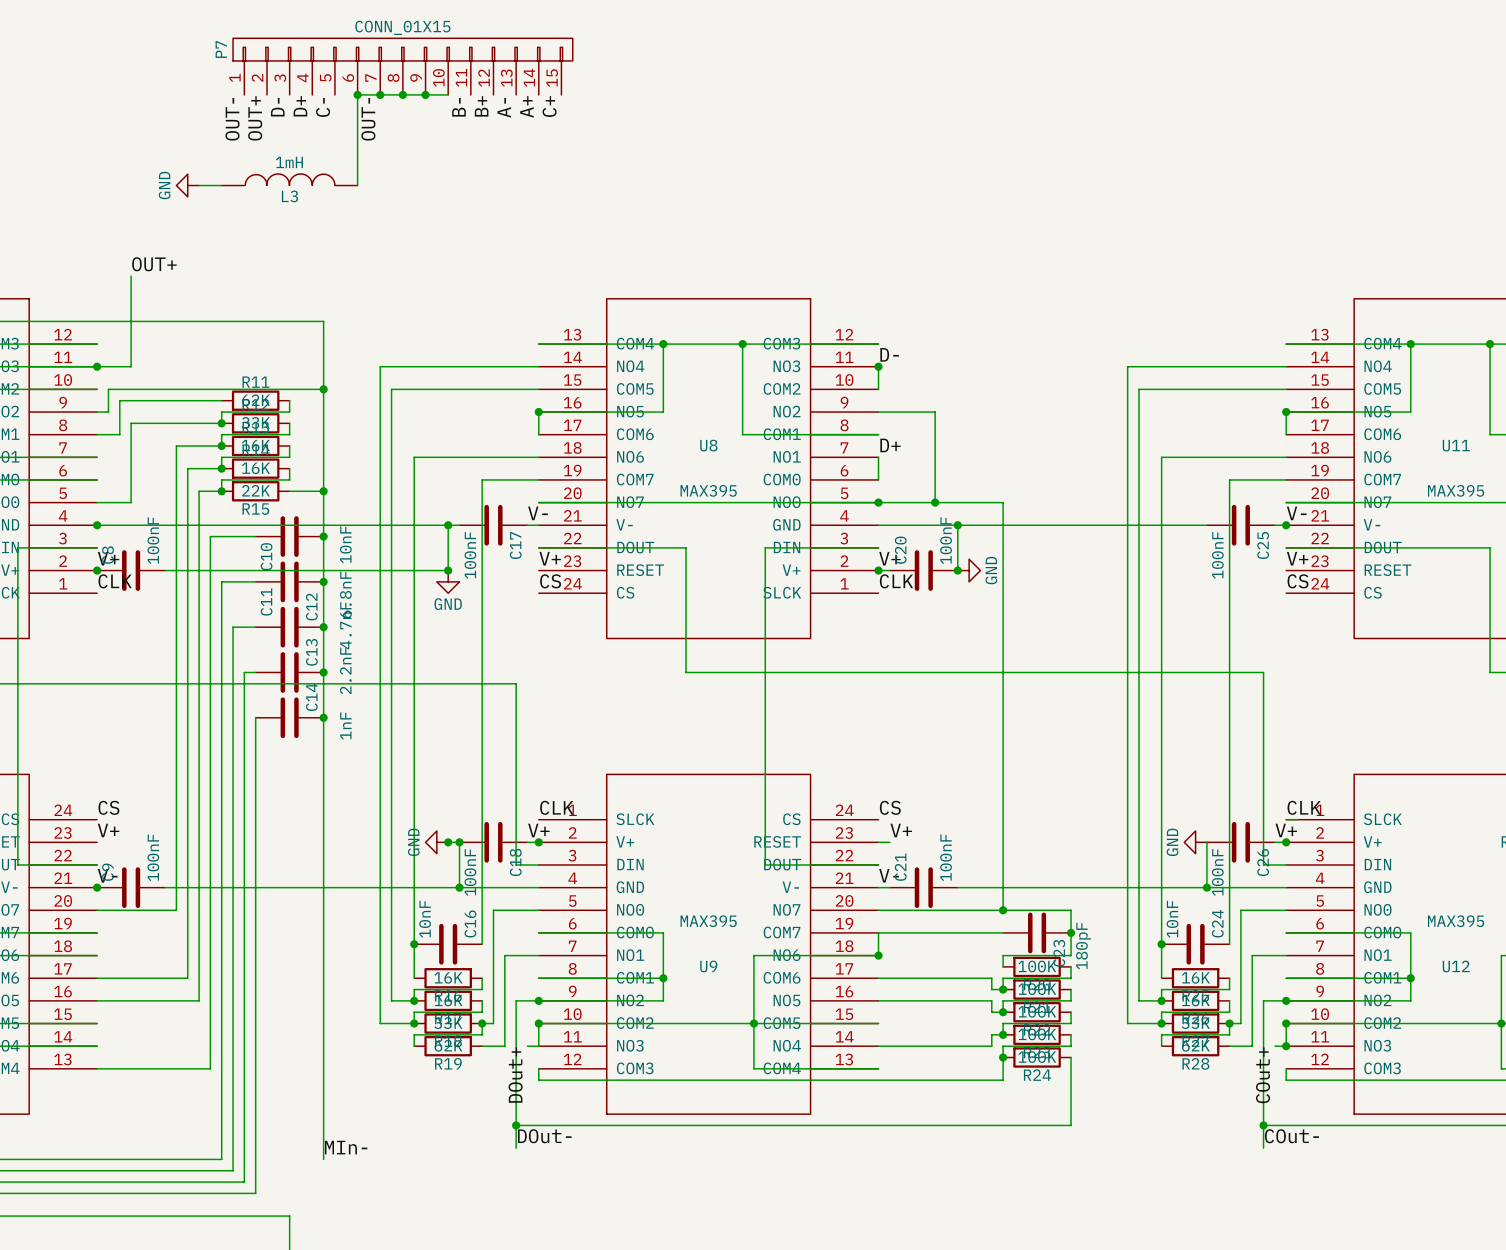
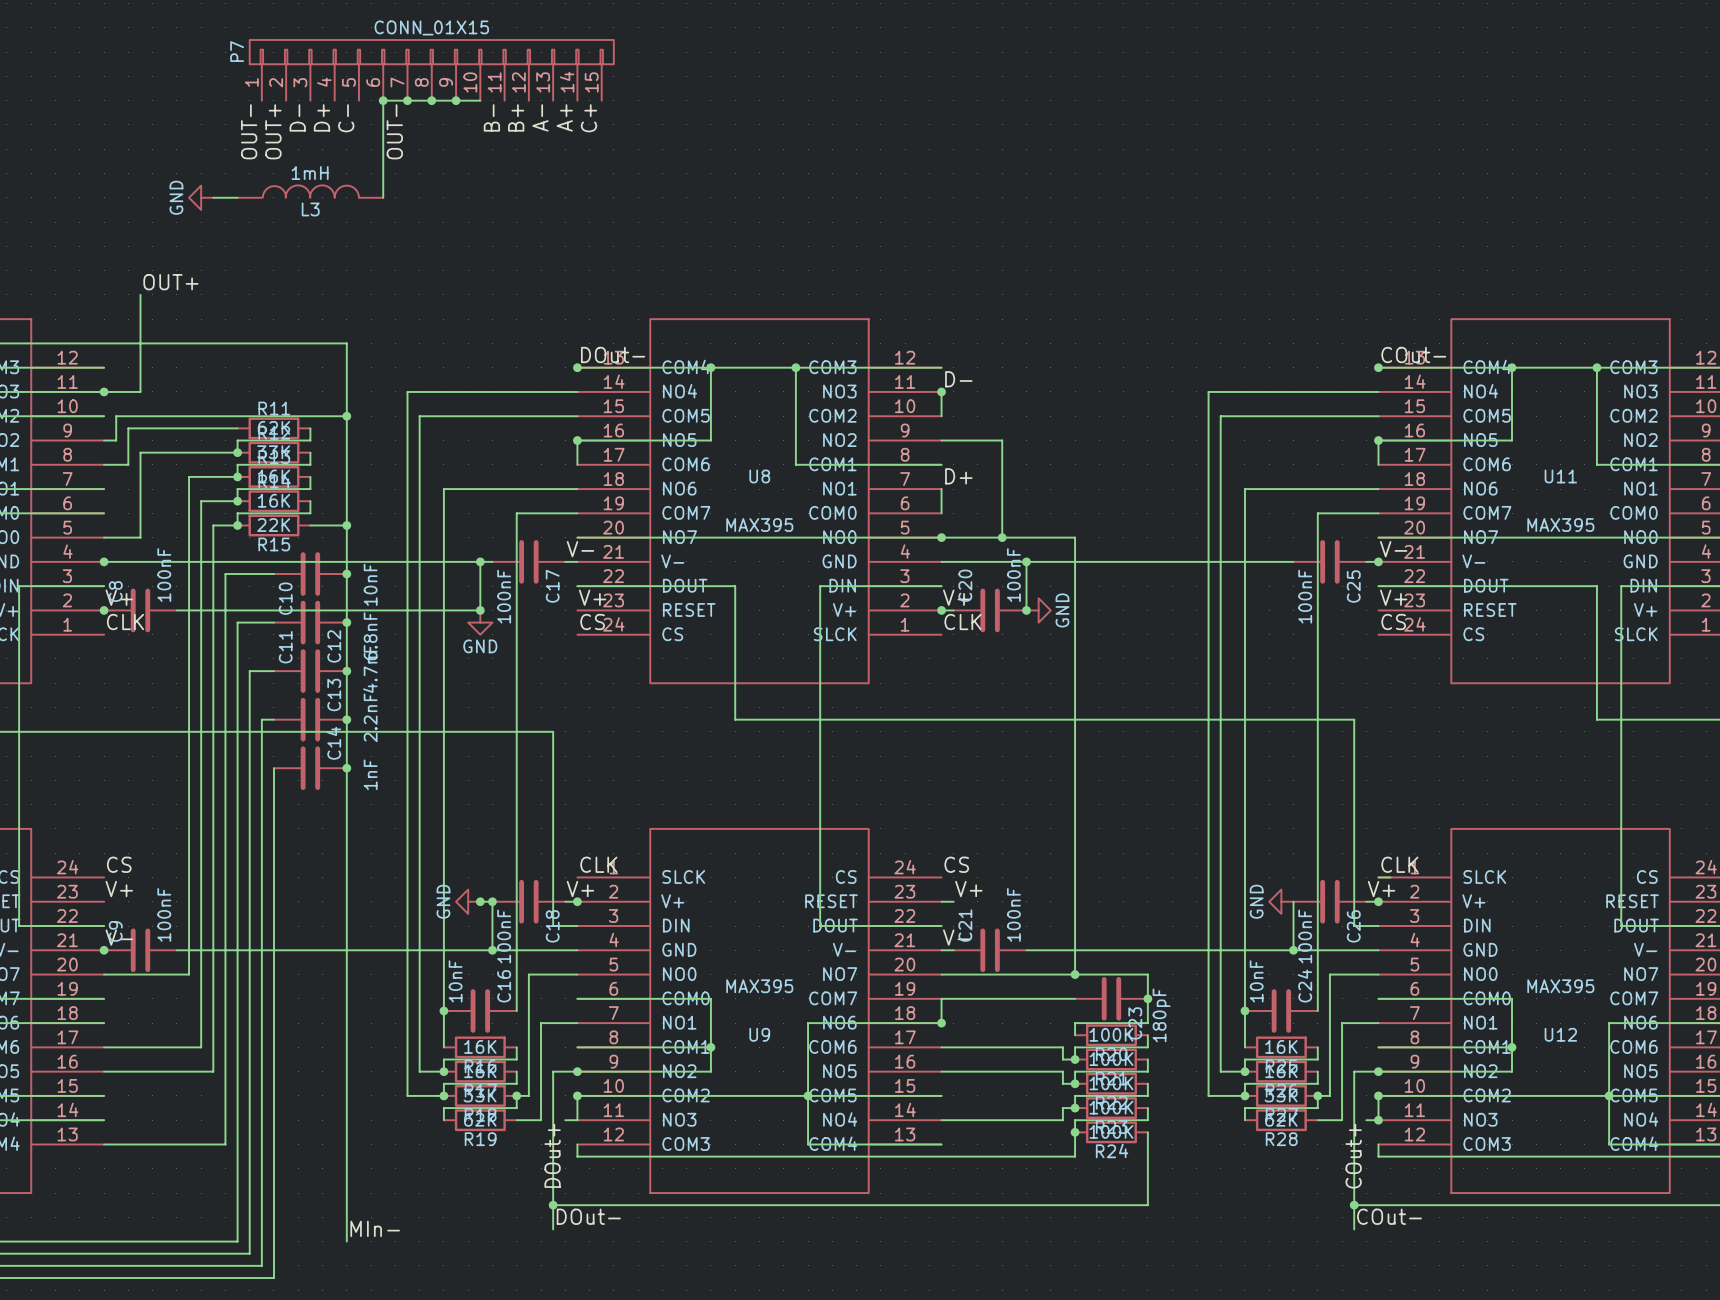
label: none -> DOut- (613, 354)
label: none -> COut- (1413, 354)
junction: none -> (577, 367)
junction: none -> (1378, 367)

